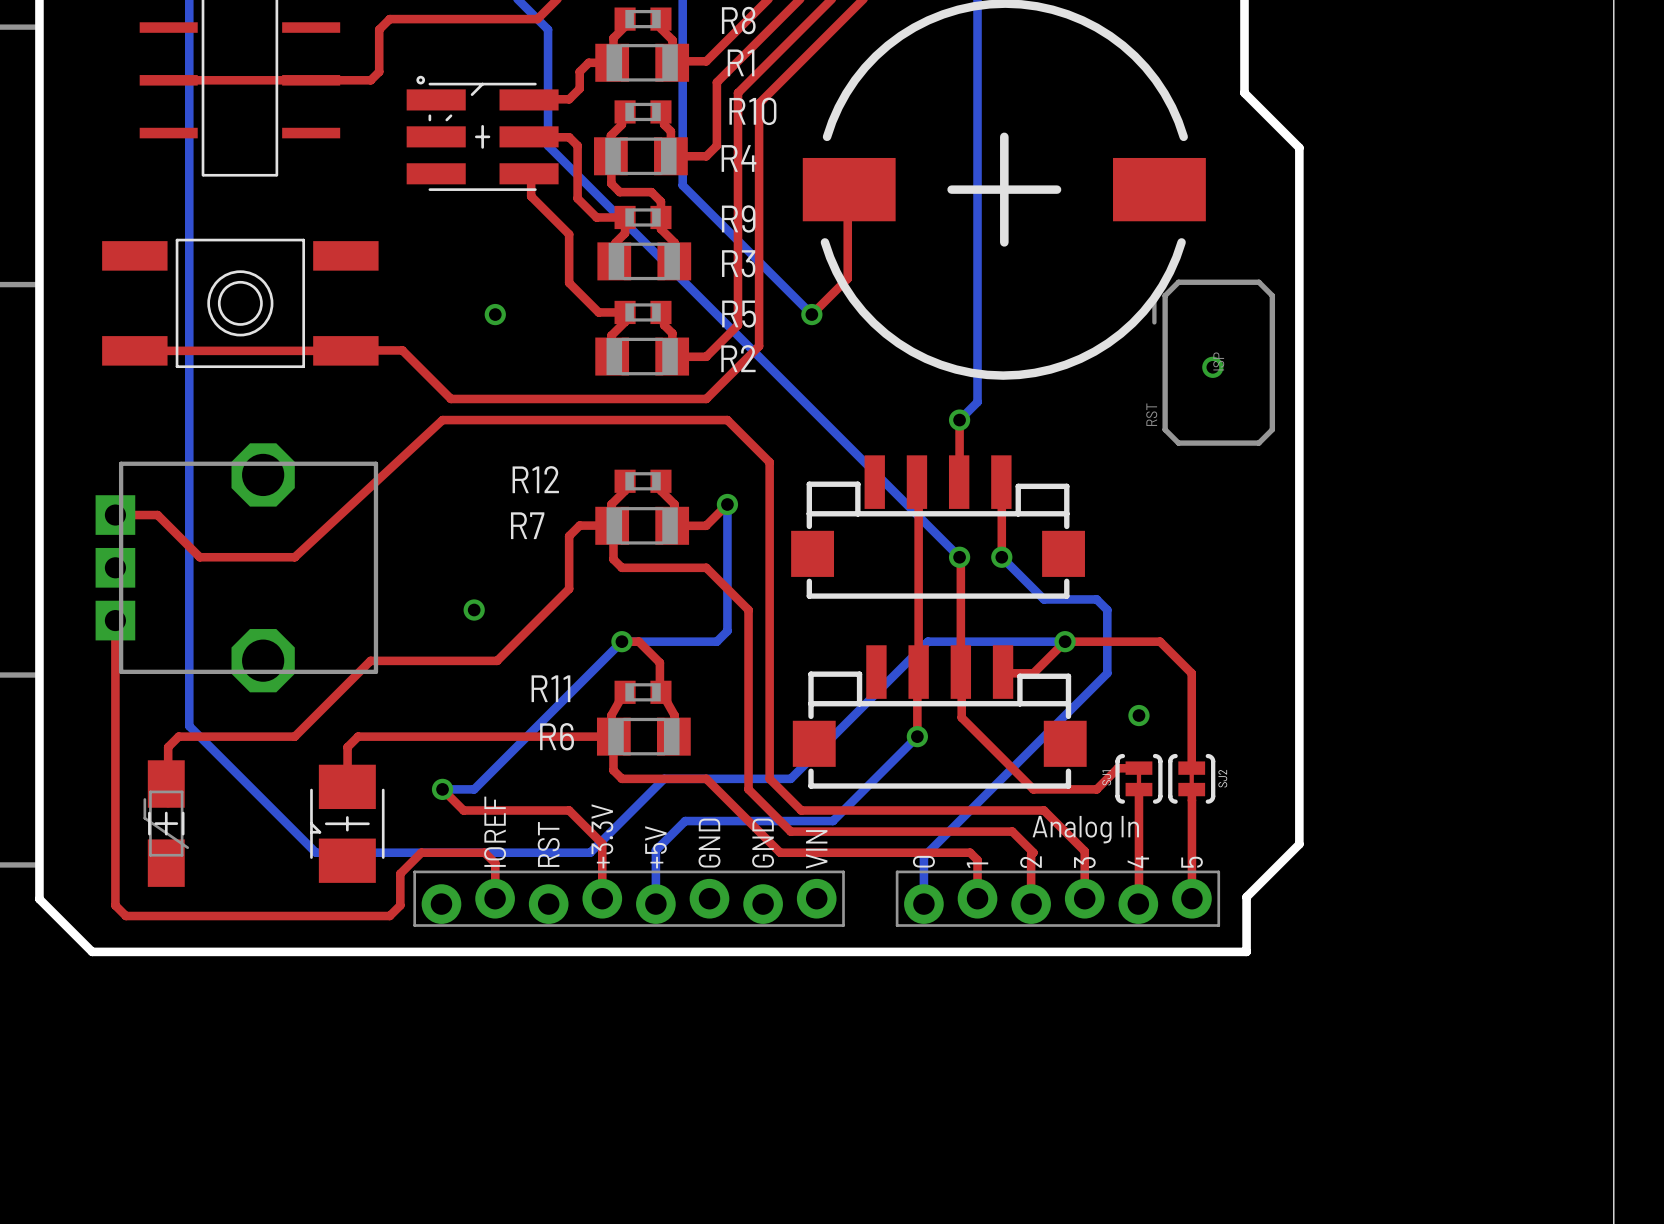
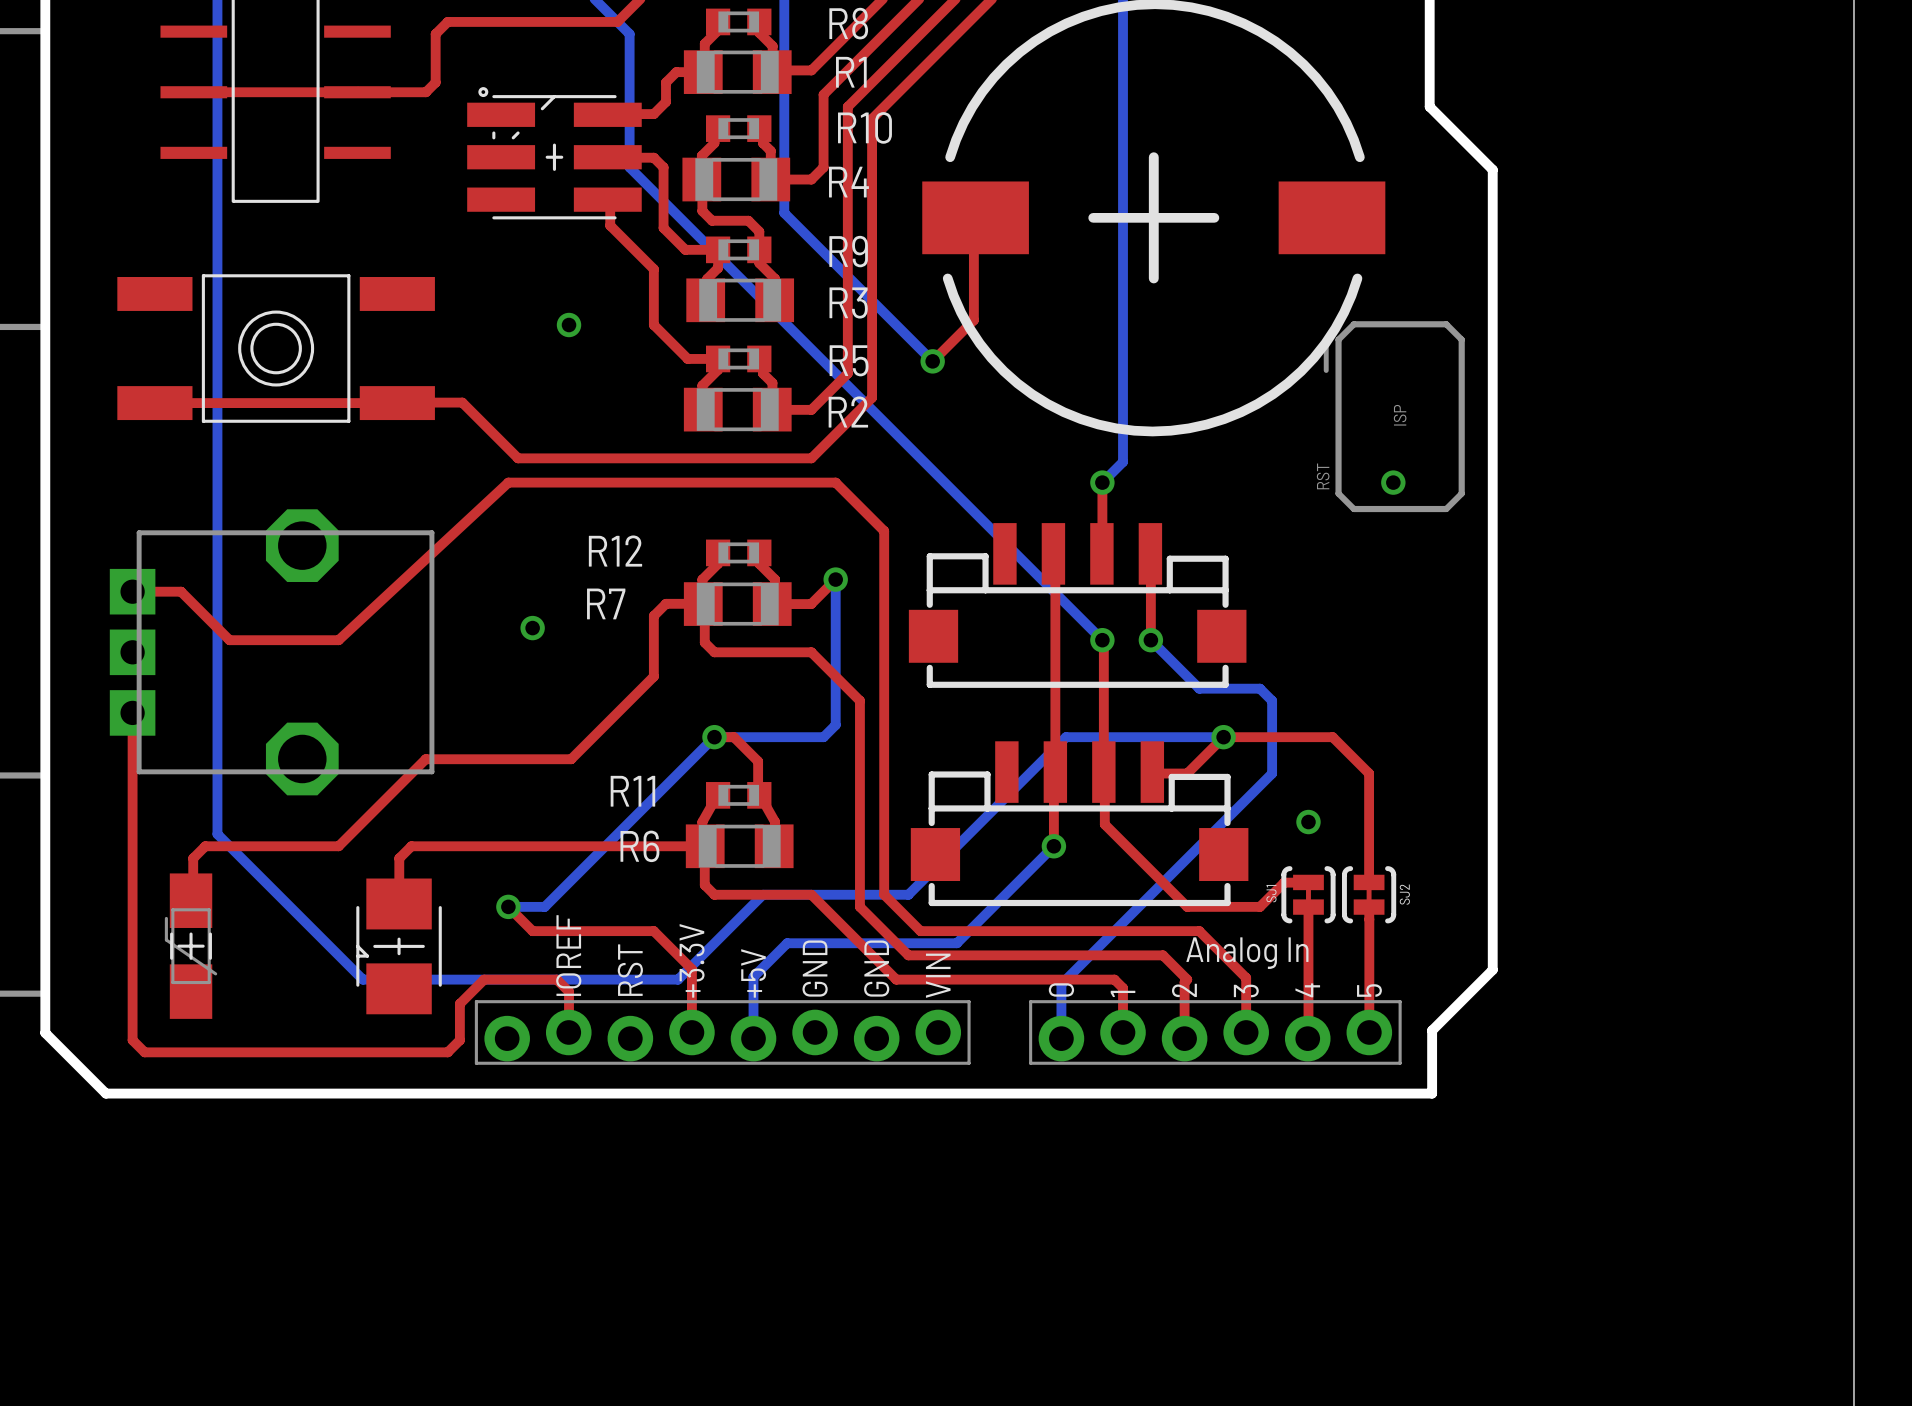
via position: (495, 314) -> (569, 325)
via position: (1212, 367) -> (1393, 482)
via position: (474, 610) -> (532, 628)

